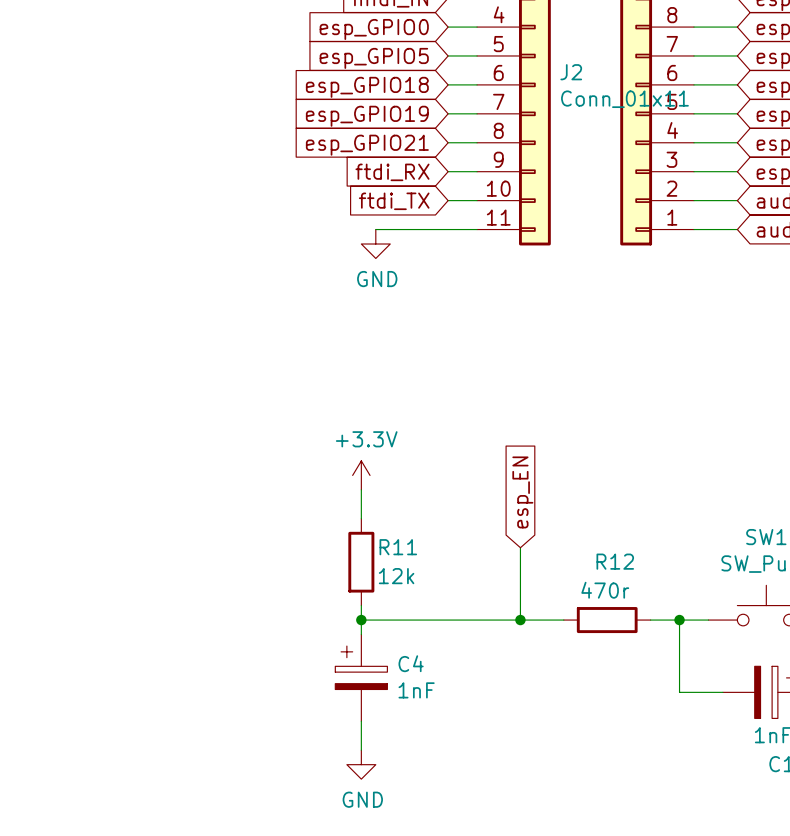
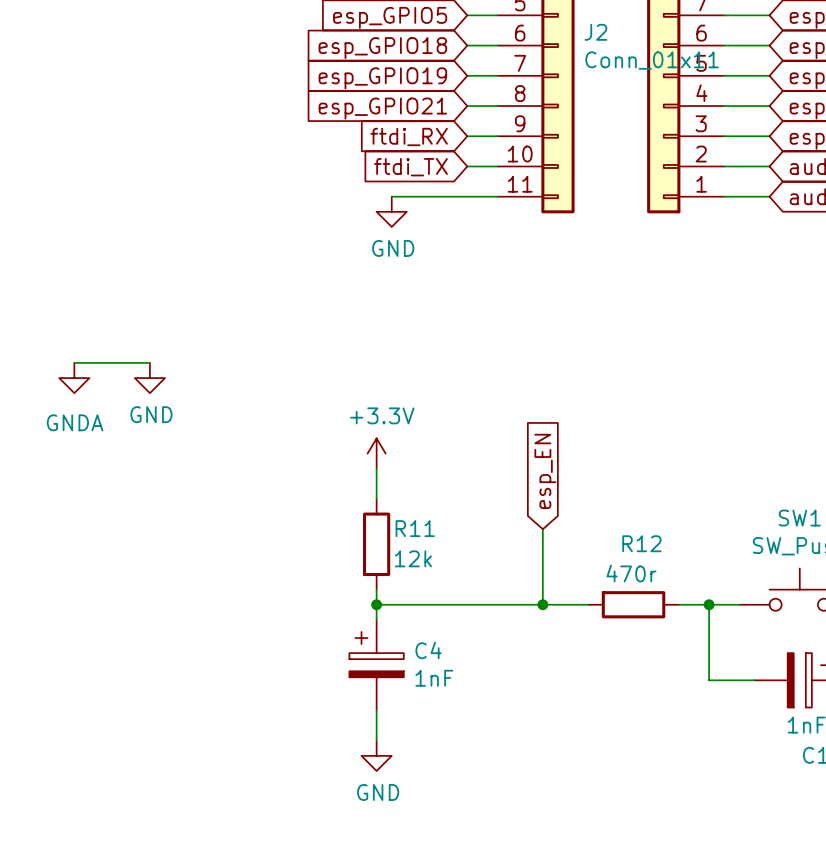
wire: none -> (74, 362) (149, 362)
power symbol: none -> GNDA (74, 378)
power symbol: none -> GND (149, 378)

